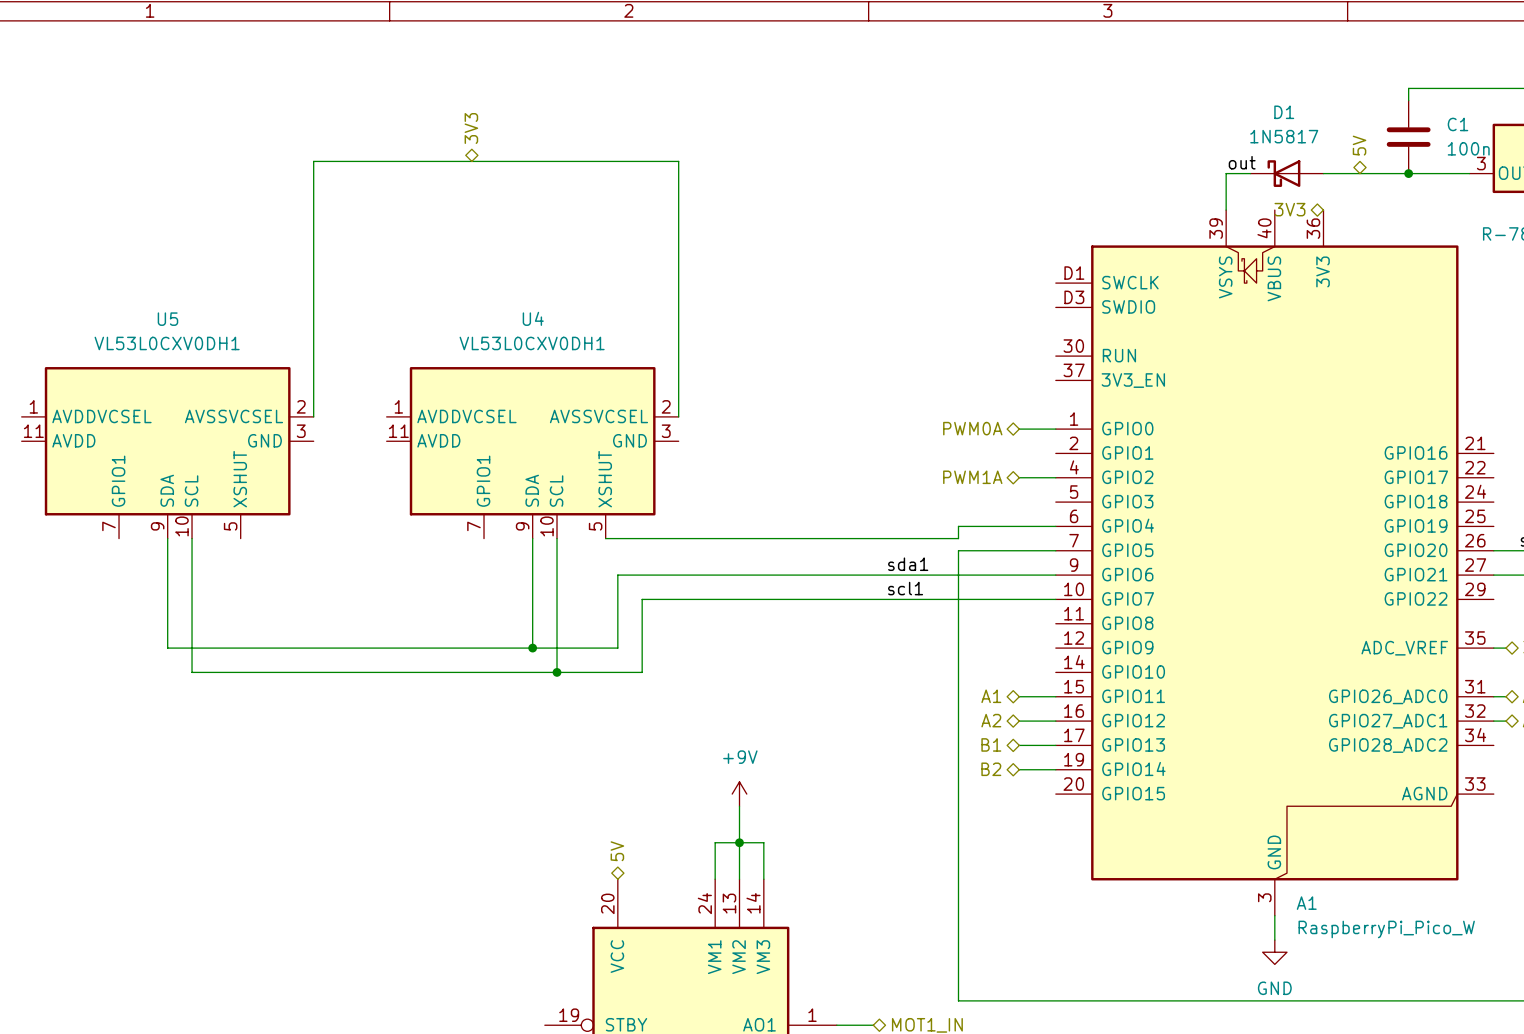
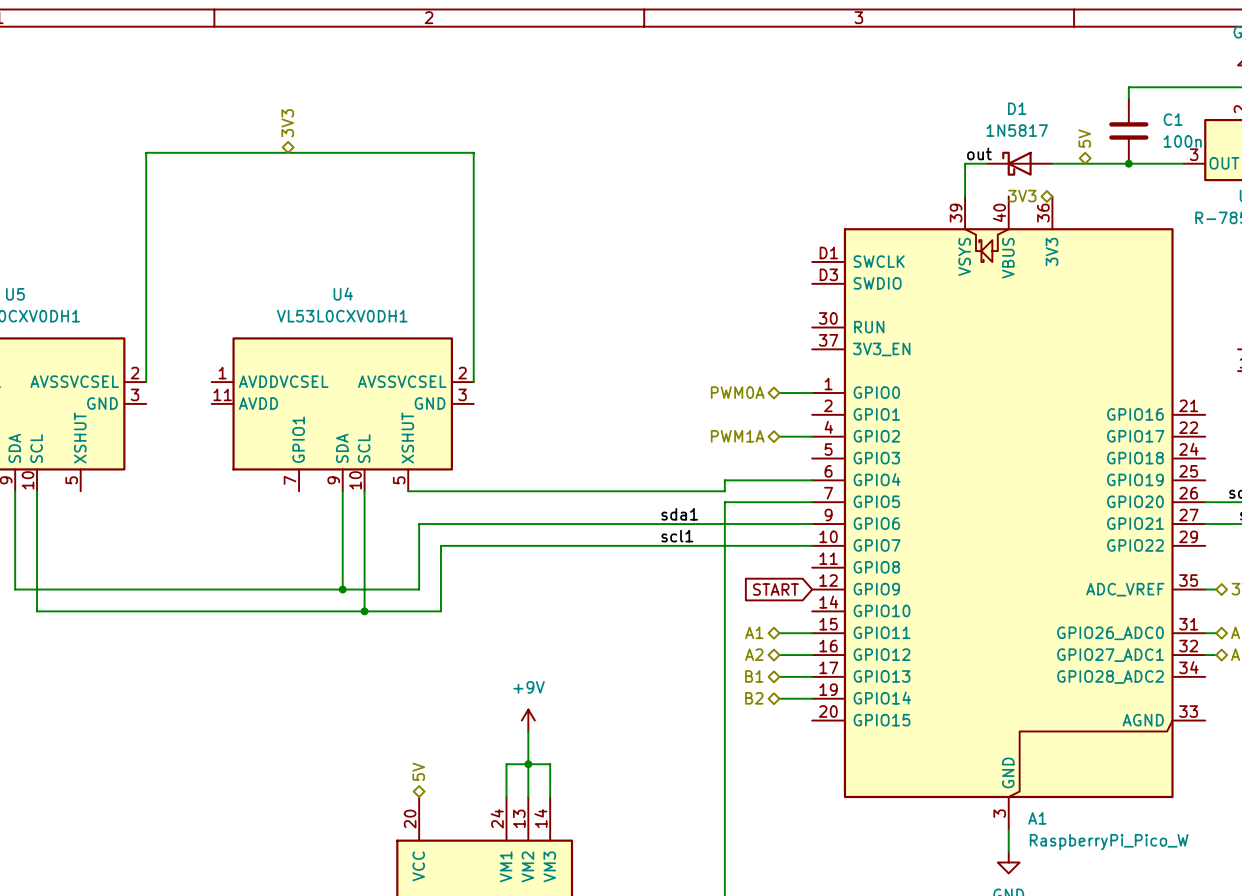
global label: none -> START (775, 589)

